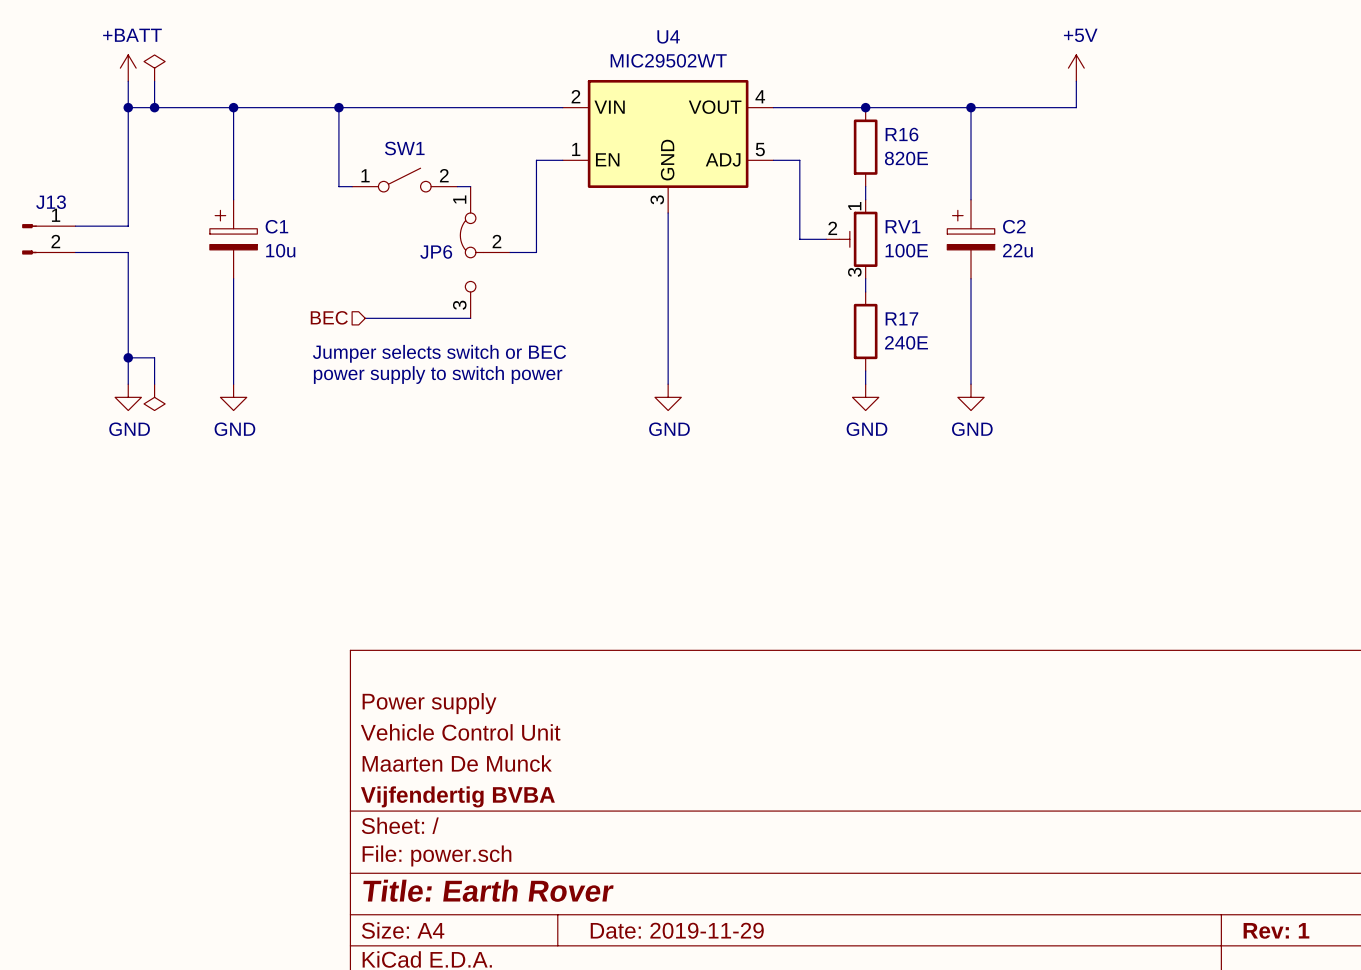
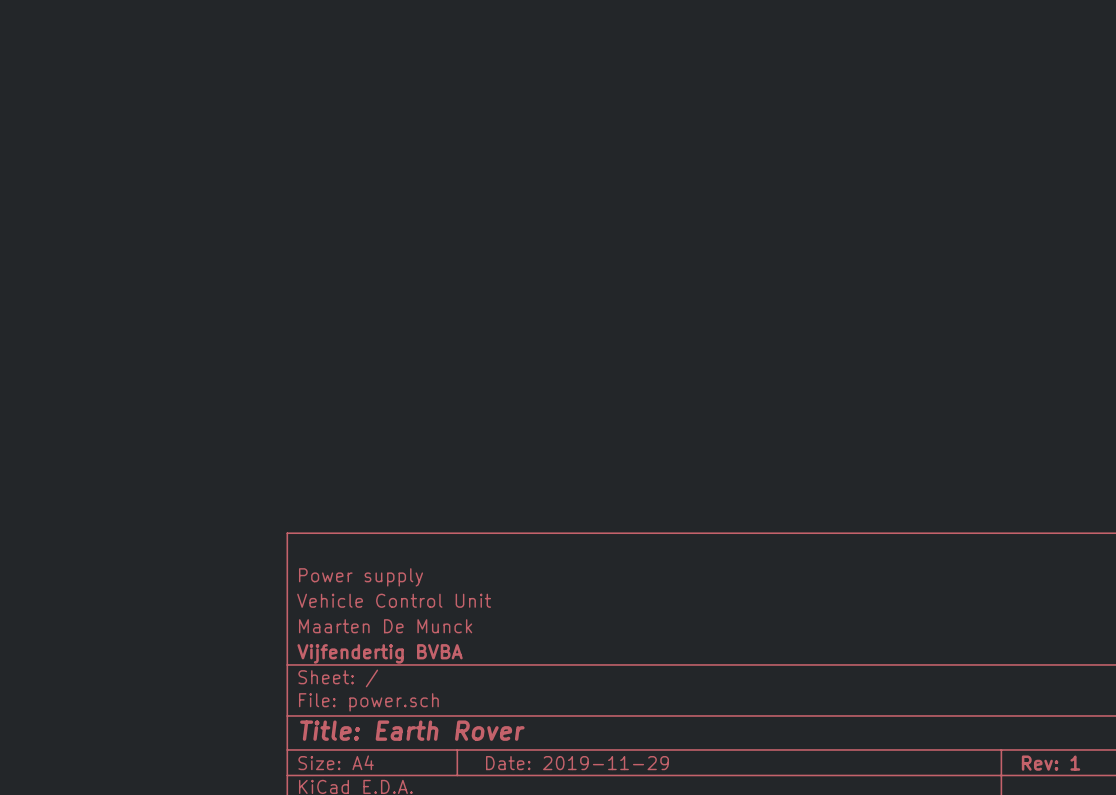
power symbol: +BATT (128, 68) -> none
power symbol: (154, 68) -> none
power symbol: +5V (1076, 68) -> none
wire: (128, 81) (128, 226) (75, 226) -> none
wire: (154, 81) (154, 107) -> none
wire: (1076, 81) (1076, 107) (773, 107) -> none
wire: (128, 107) (562, 107) -> none
junction: (128, 107) -> none
junction: (154, 107) -> none
wire: (233, 107) (233, 199) -> none
junction: (233, 107) -> none
wire: (338, 107) (338, 186) (352, 186) -> none
junction: (338, 107) -> none
junction: (865, 107) -> none
wire: (971, 107) (971, 199) -> none
junction: (971, 107) -> none
U4: MIC29502WT (668, 146) -> none
R16: 820E (865, 147) -> none
wire: (562, 160) (536, 160) (536, 252) (510, 252) -> none
wire: (773, 160) (799, 160) (799, 239) (826, 239) -> none
SW1: (404, 180) -> none
wire: (457, 186) (470, 186) -> none
wire: (865, 186) (865, 199) -> none
wire: (668, 212) (668, 384) -> none
J13: (48, 239) -> none
C1: 10u (233, 239) -> none
RV1: 100E (851, 239) -> none
C2: 22u (971, 239) -> none
wire: (75, 252) (128, 252) (128, 384) -> none
JP6: (485, 252) -> none
wire: (233, 278) (233, 384) -> none
wire: (865, 278) (865, 292) -> none
wire: (971, 278) (971, 384) -> none
hierarchical label: BEC (329, 317) -> none
wire: (365, 318) (470, 318) -> none
R17: 240E (865, 331) -> none
text: Jumper selects switch or BEC (439, 353) -> none
wire: (128, 357) (154, 357) (154, 384) -> none
junction: (128, 357) -> none
wire: (865, 371) (865, 384) -> none
text: power supply to switch power (438, 375) -> none
power symbol: GND (128, 397) -> none
power symbol: (154, 397) -> none
power symbol: GND (233, 397) -> none
power symbol: GND (668, 397) -> none
power symbol: GND (865, 397) -> none
power symbol: GND (971, 397) -> none

